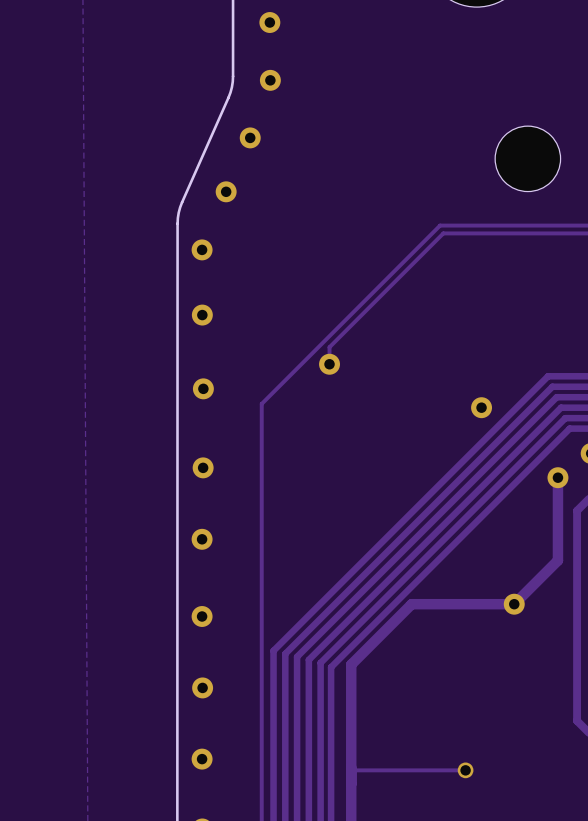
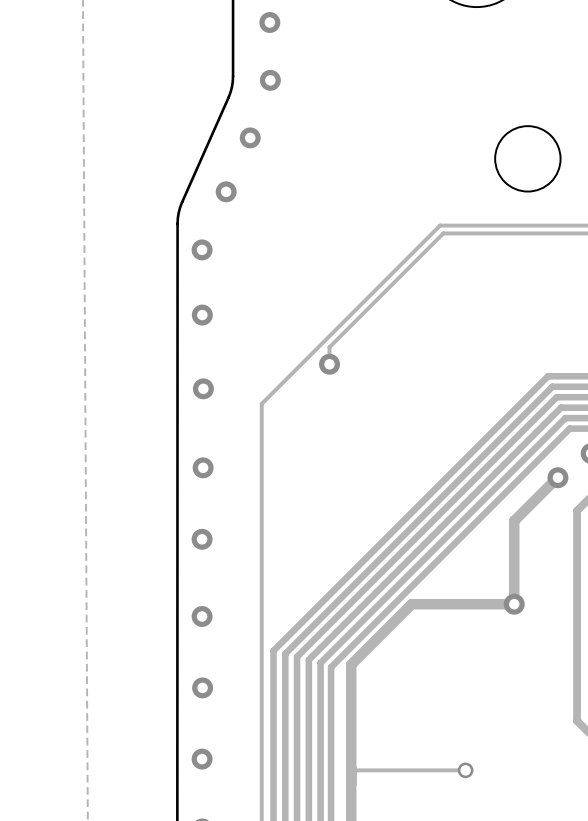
via: (481, 407) -> none
track: (557, 477) (557, 560) (514, 604) -> (557, 477) (514, 520) (514, 604)

